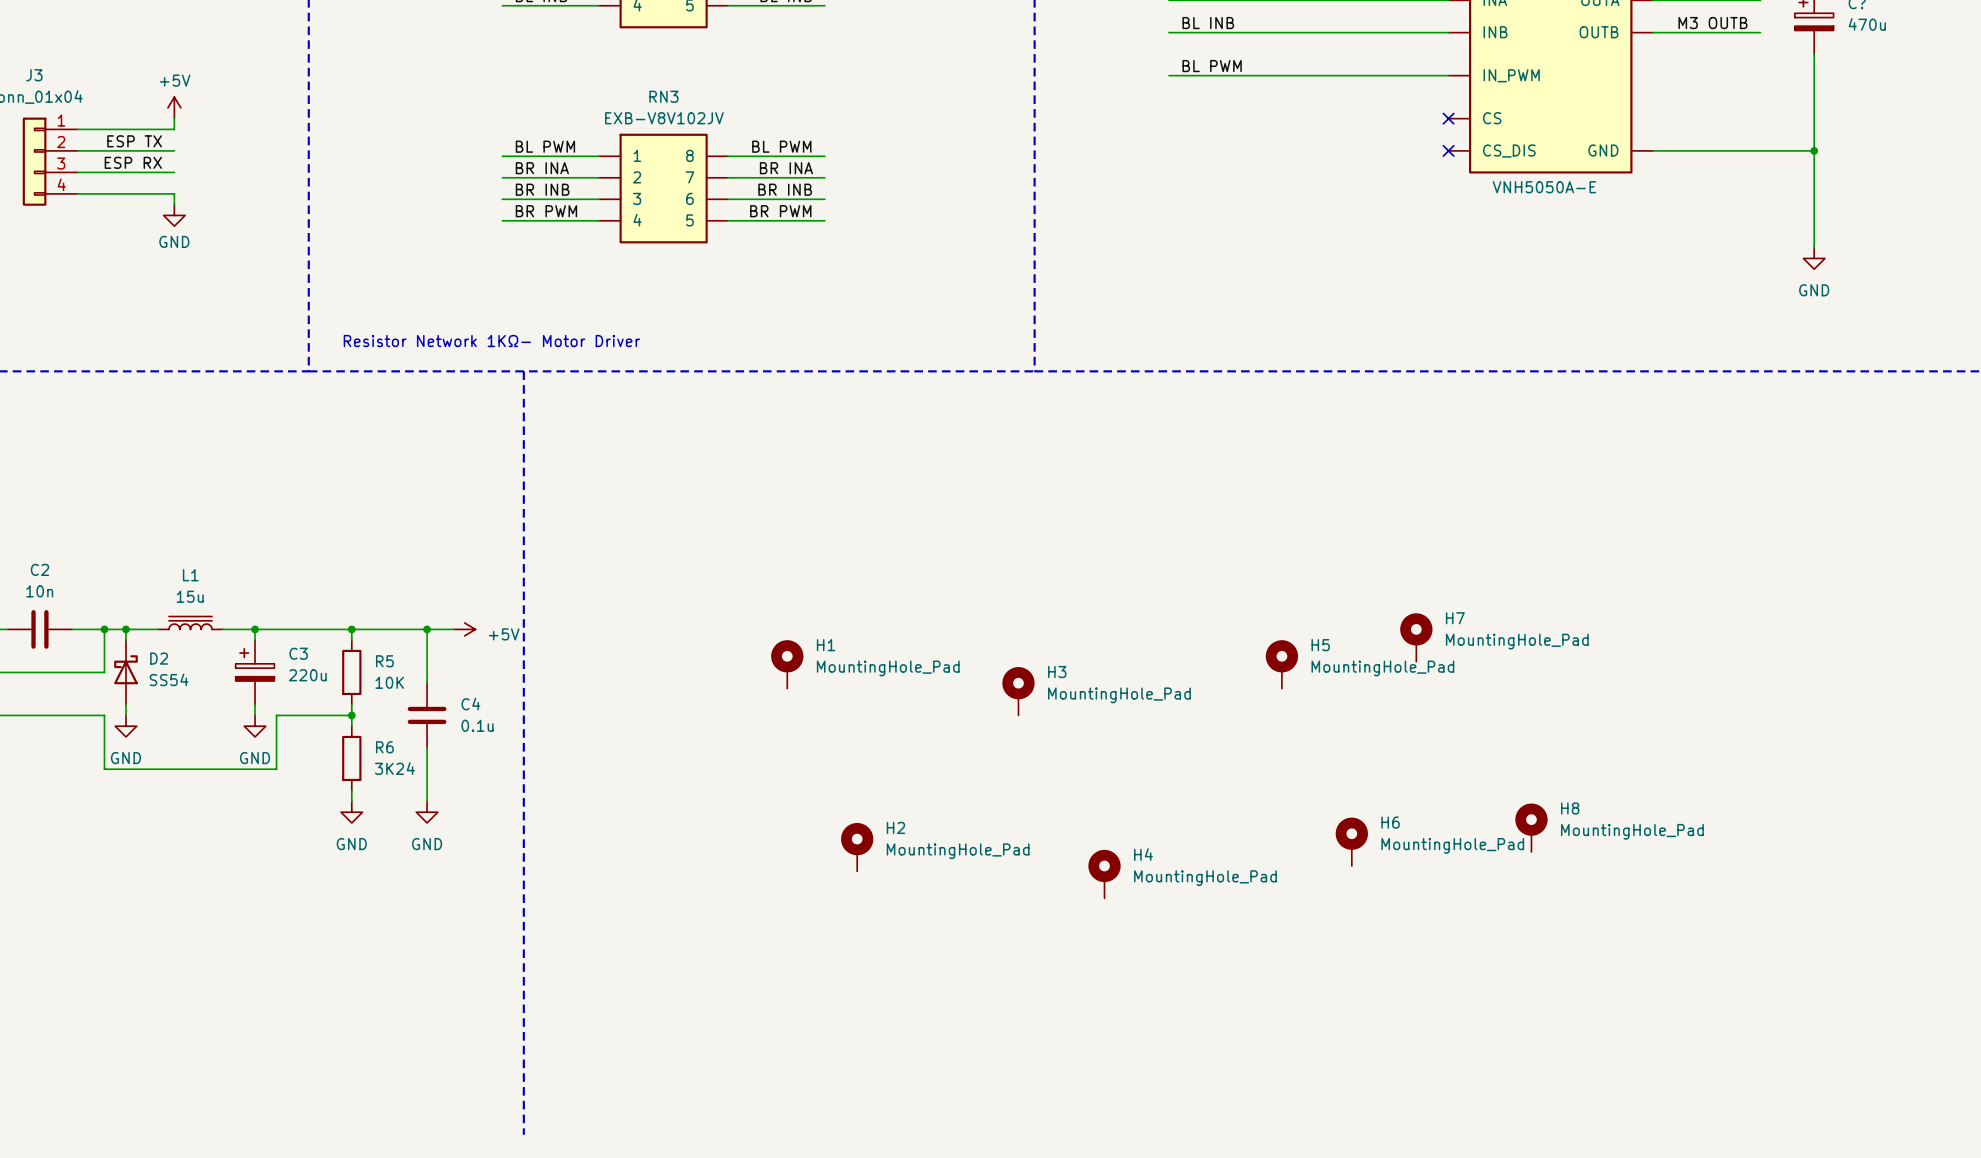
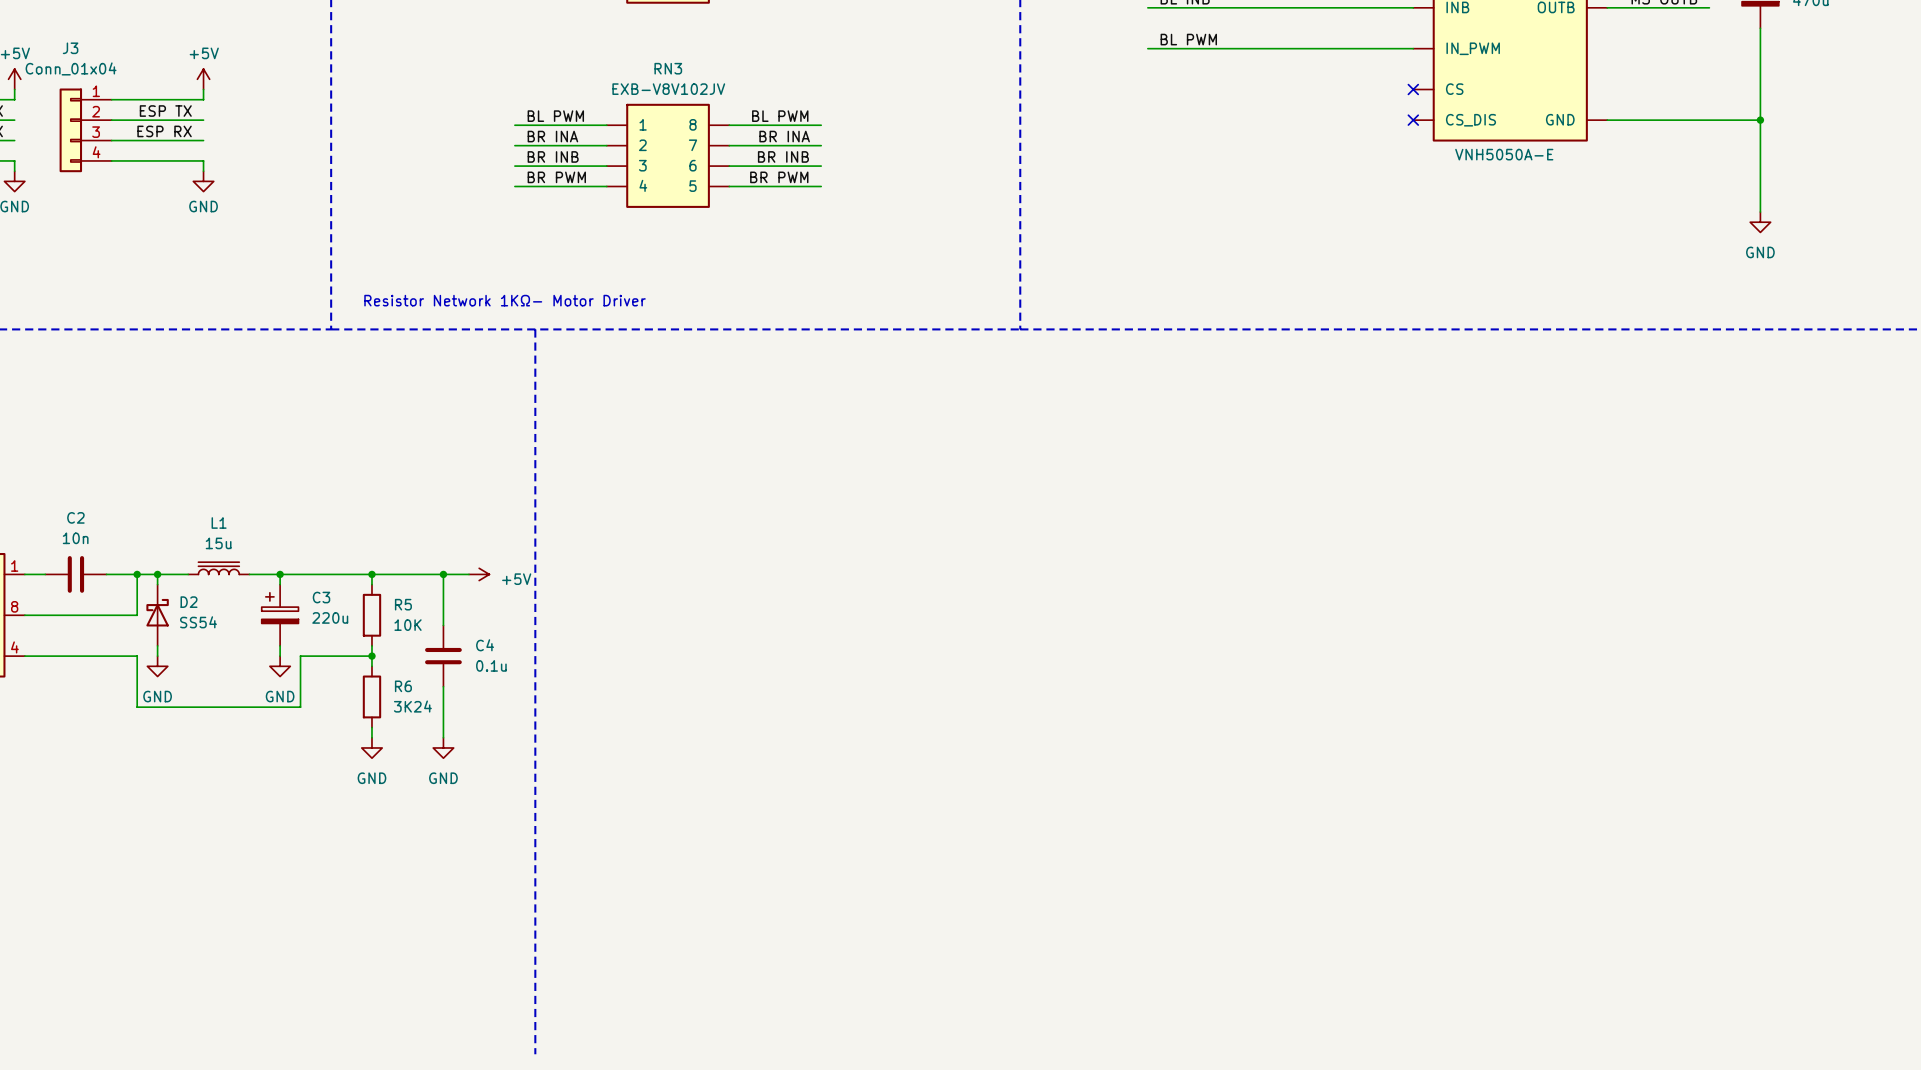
H7: MountingHole_Pad (1416, 637) -> none
H1: MountingHole_Pad (787, 664) -> none
H5: MountingHole_Pad (1281, 664) -> none
H3: MountingHole_Pad (1018, 691) -> none
H8: MountingHole_Pad (1531, 827) -> none
H6: MountingHole_Pad (1351, 841) -> none
H2: MountingHole_Pad (857, 847) -> none
H4: MountingHole_Pad (1104, 874) -> none

